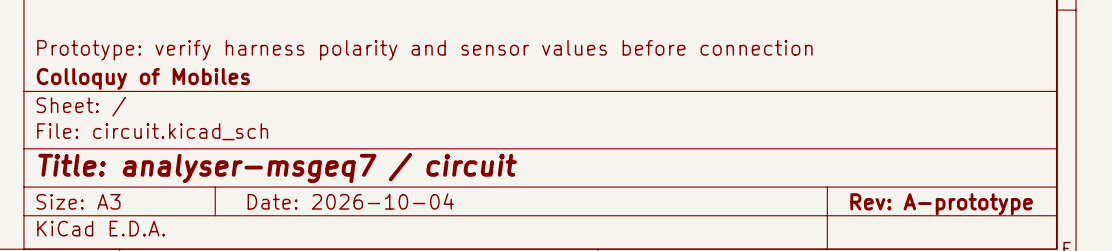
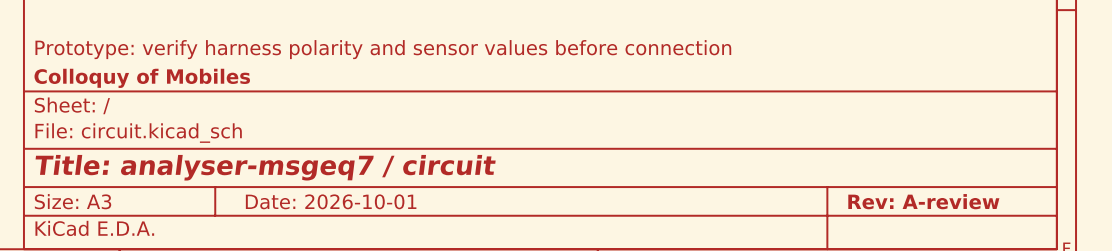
title block: Date: 2026-10-04 (350, 201) -> Date: 2026-10-01 (331, 201)
title block: Rev: A-prototype (941, 204) -> Rev: A-review (923, 201)

